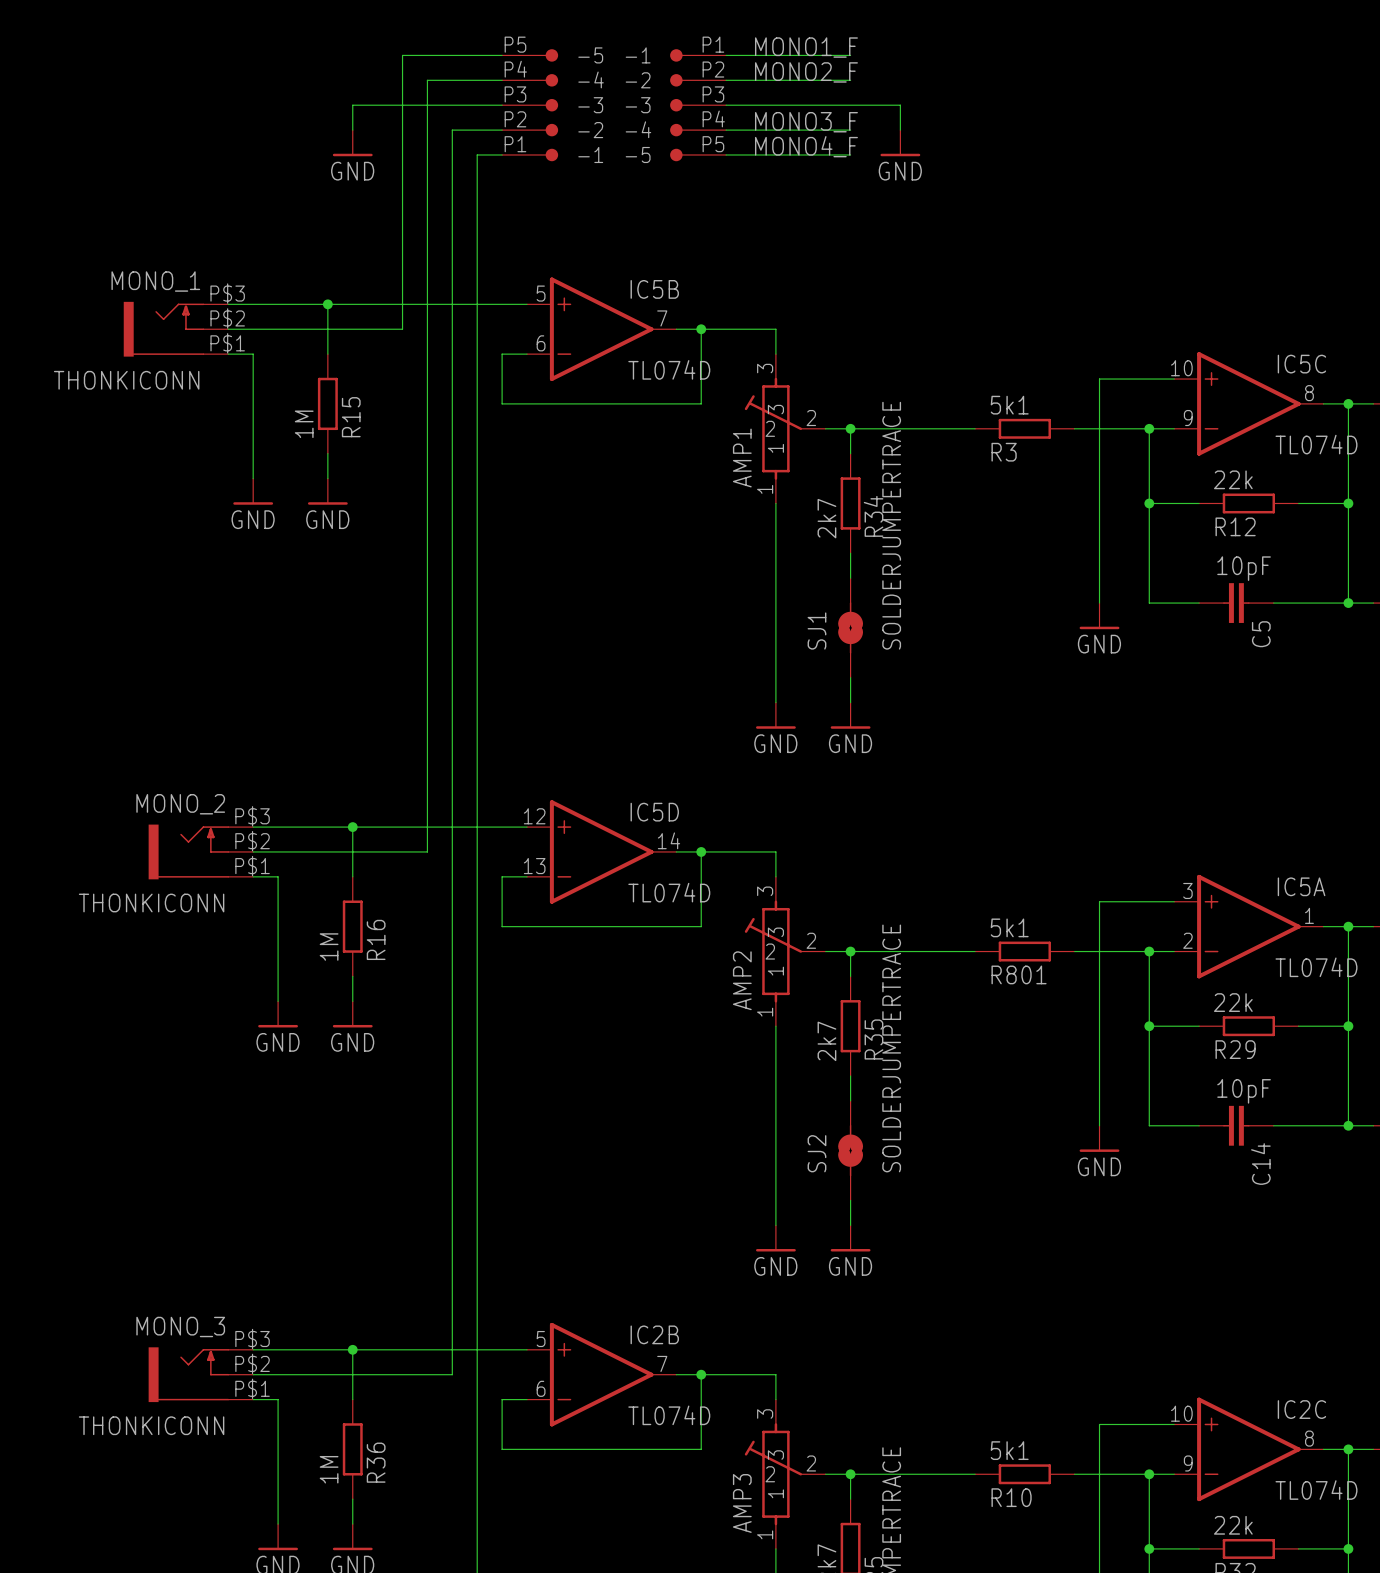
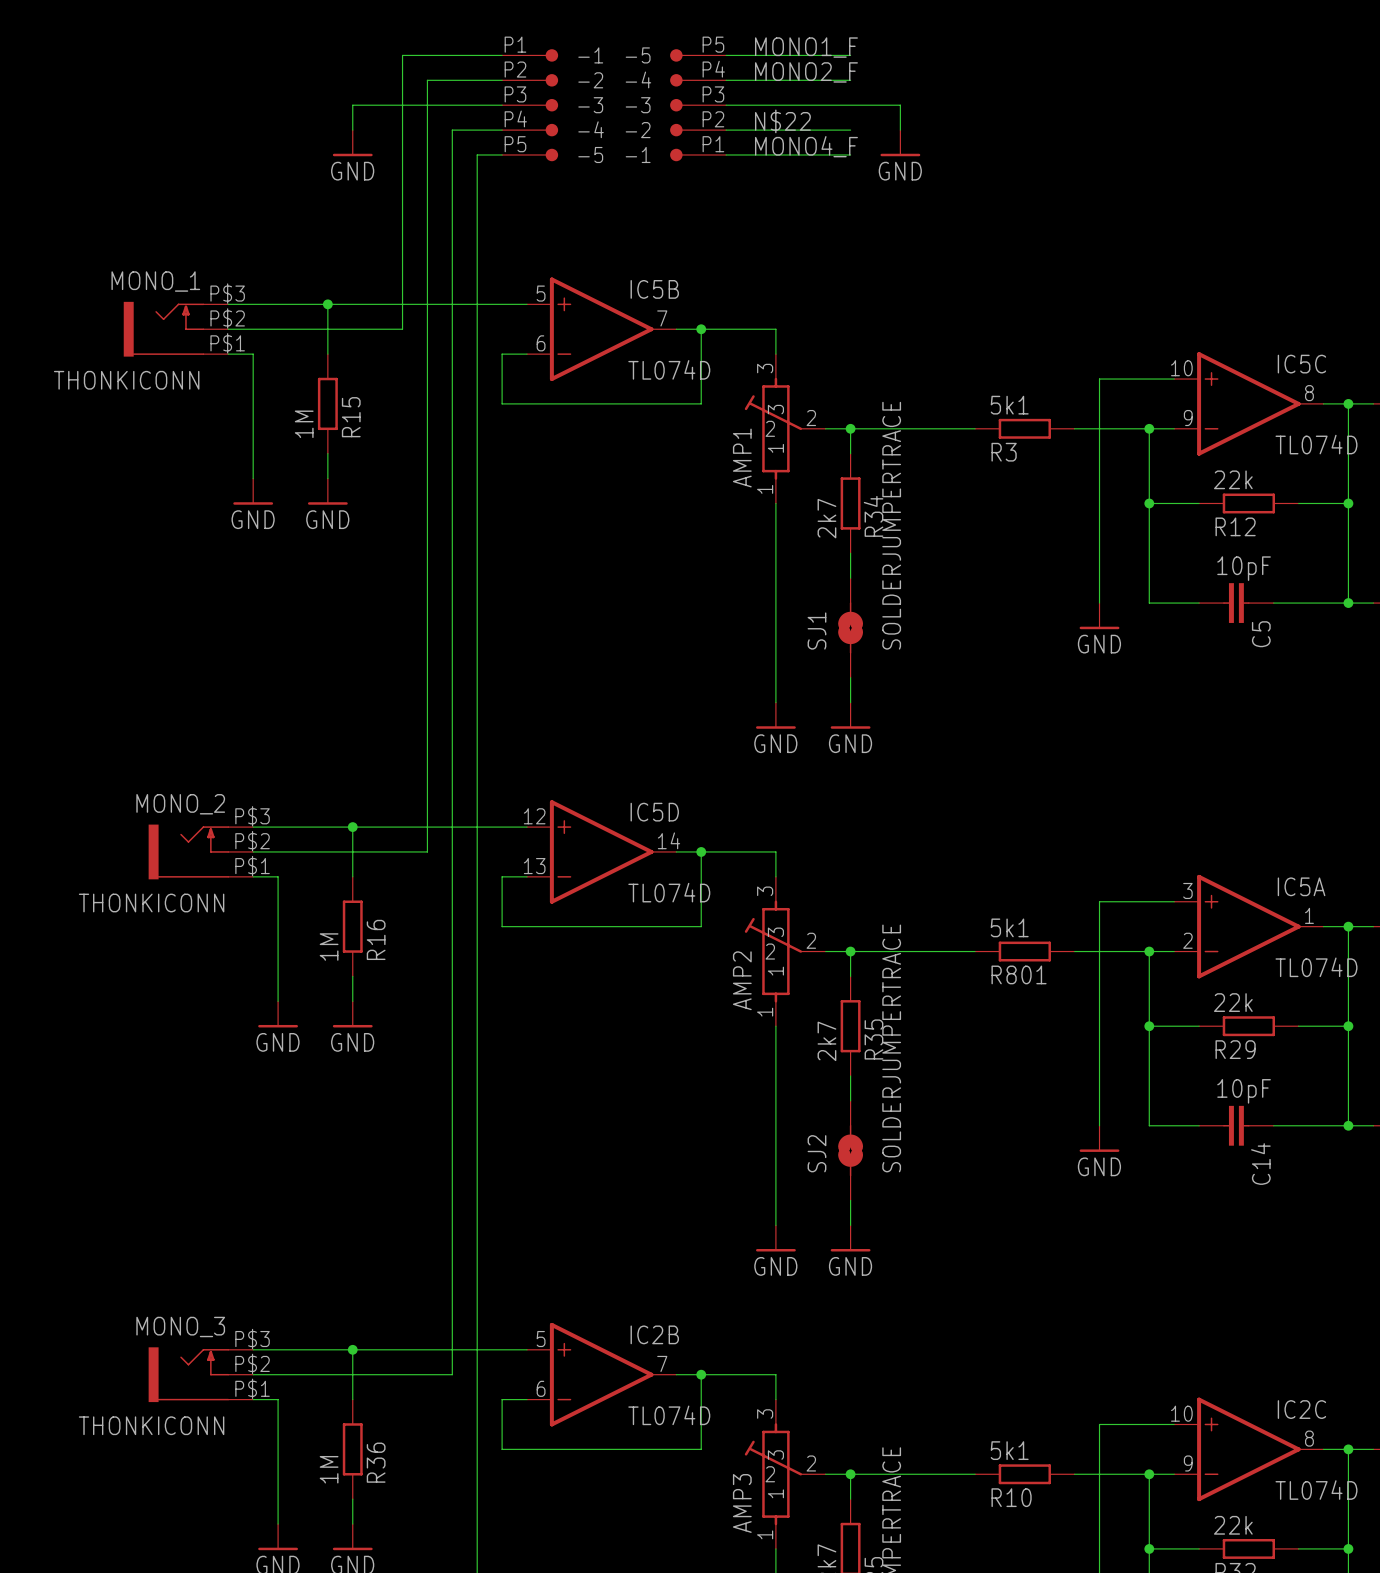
part flip: as is (551, 105) -> up-down (551, 105)
part flip: as is (676, 105) -> up-down (676, 105)
label: MONO3_F (806, 122) -> N$22 (782, 121)

